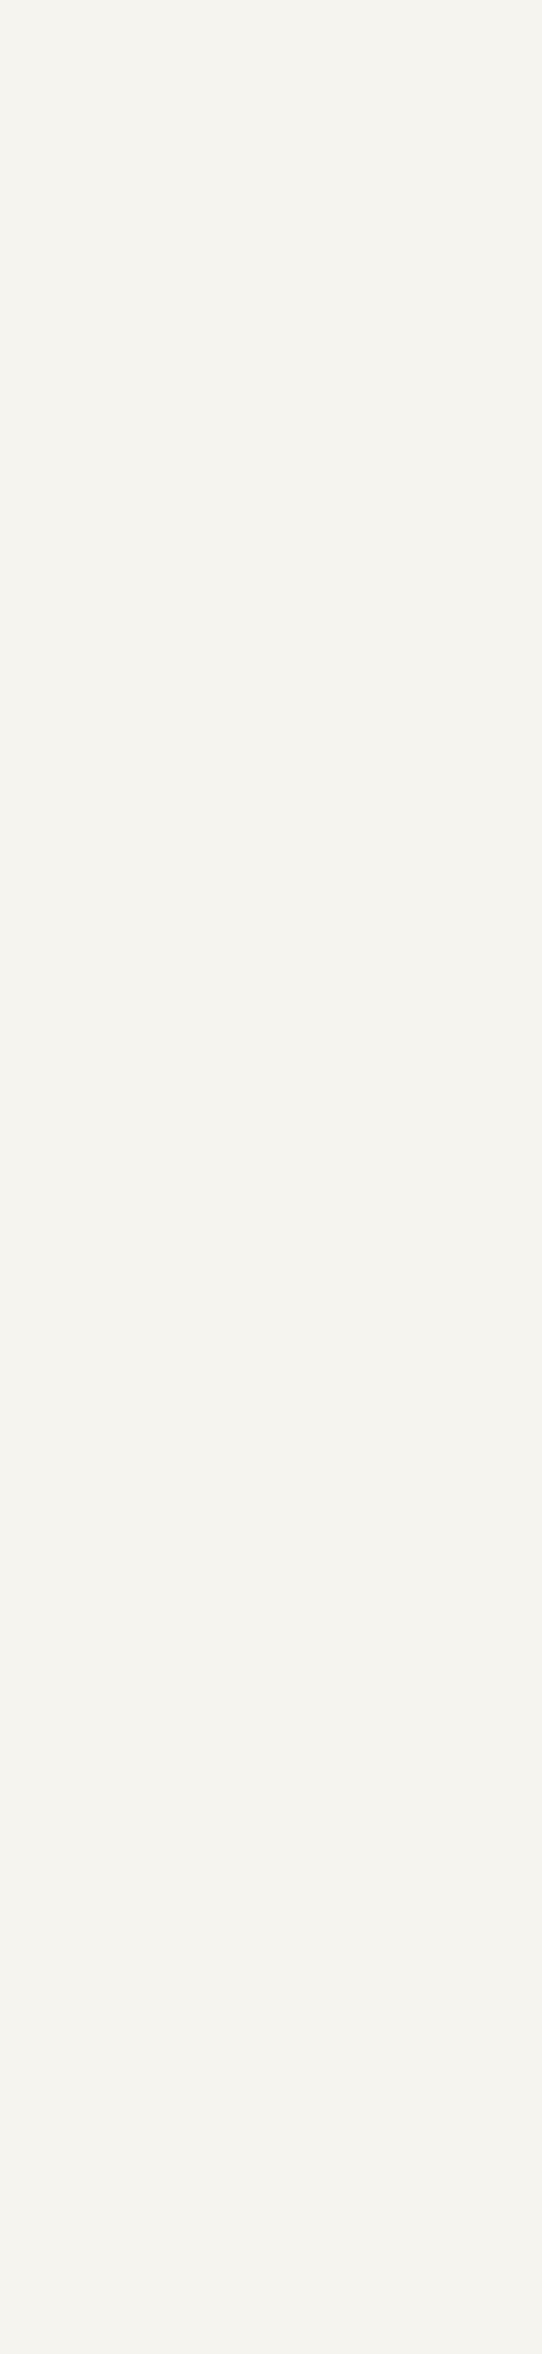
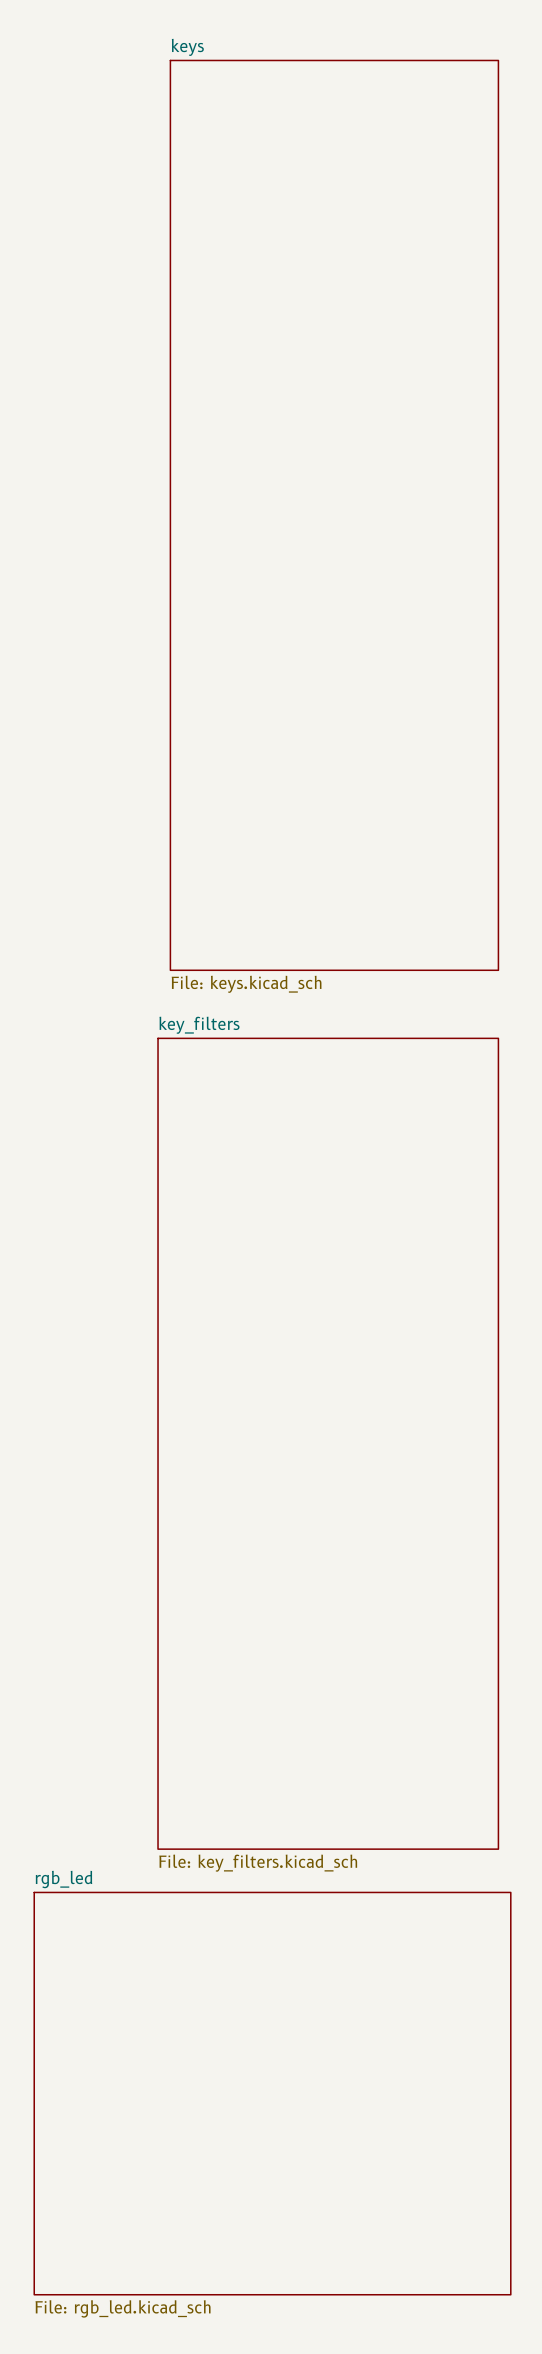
sheet keys: none -> File: keys.kicad_sch (334, 515)
sheet key_filters: none -> File: key_filters.kicad_sch (328, 1443)
sheet rgb_led: none -> File: rgb_led.kicad_sch (272, 2093)

